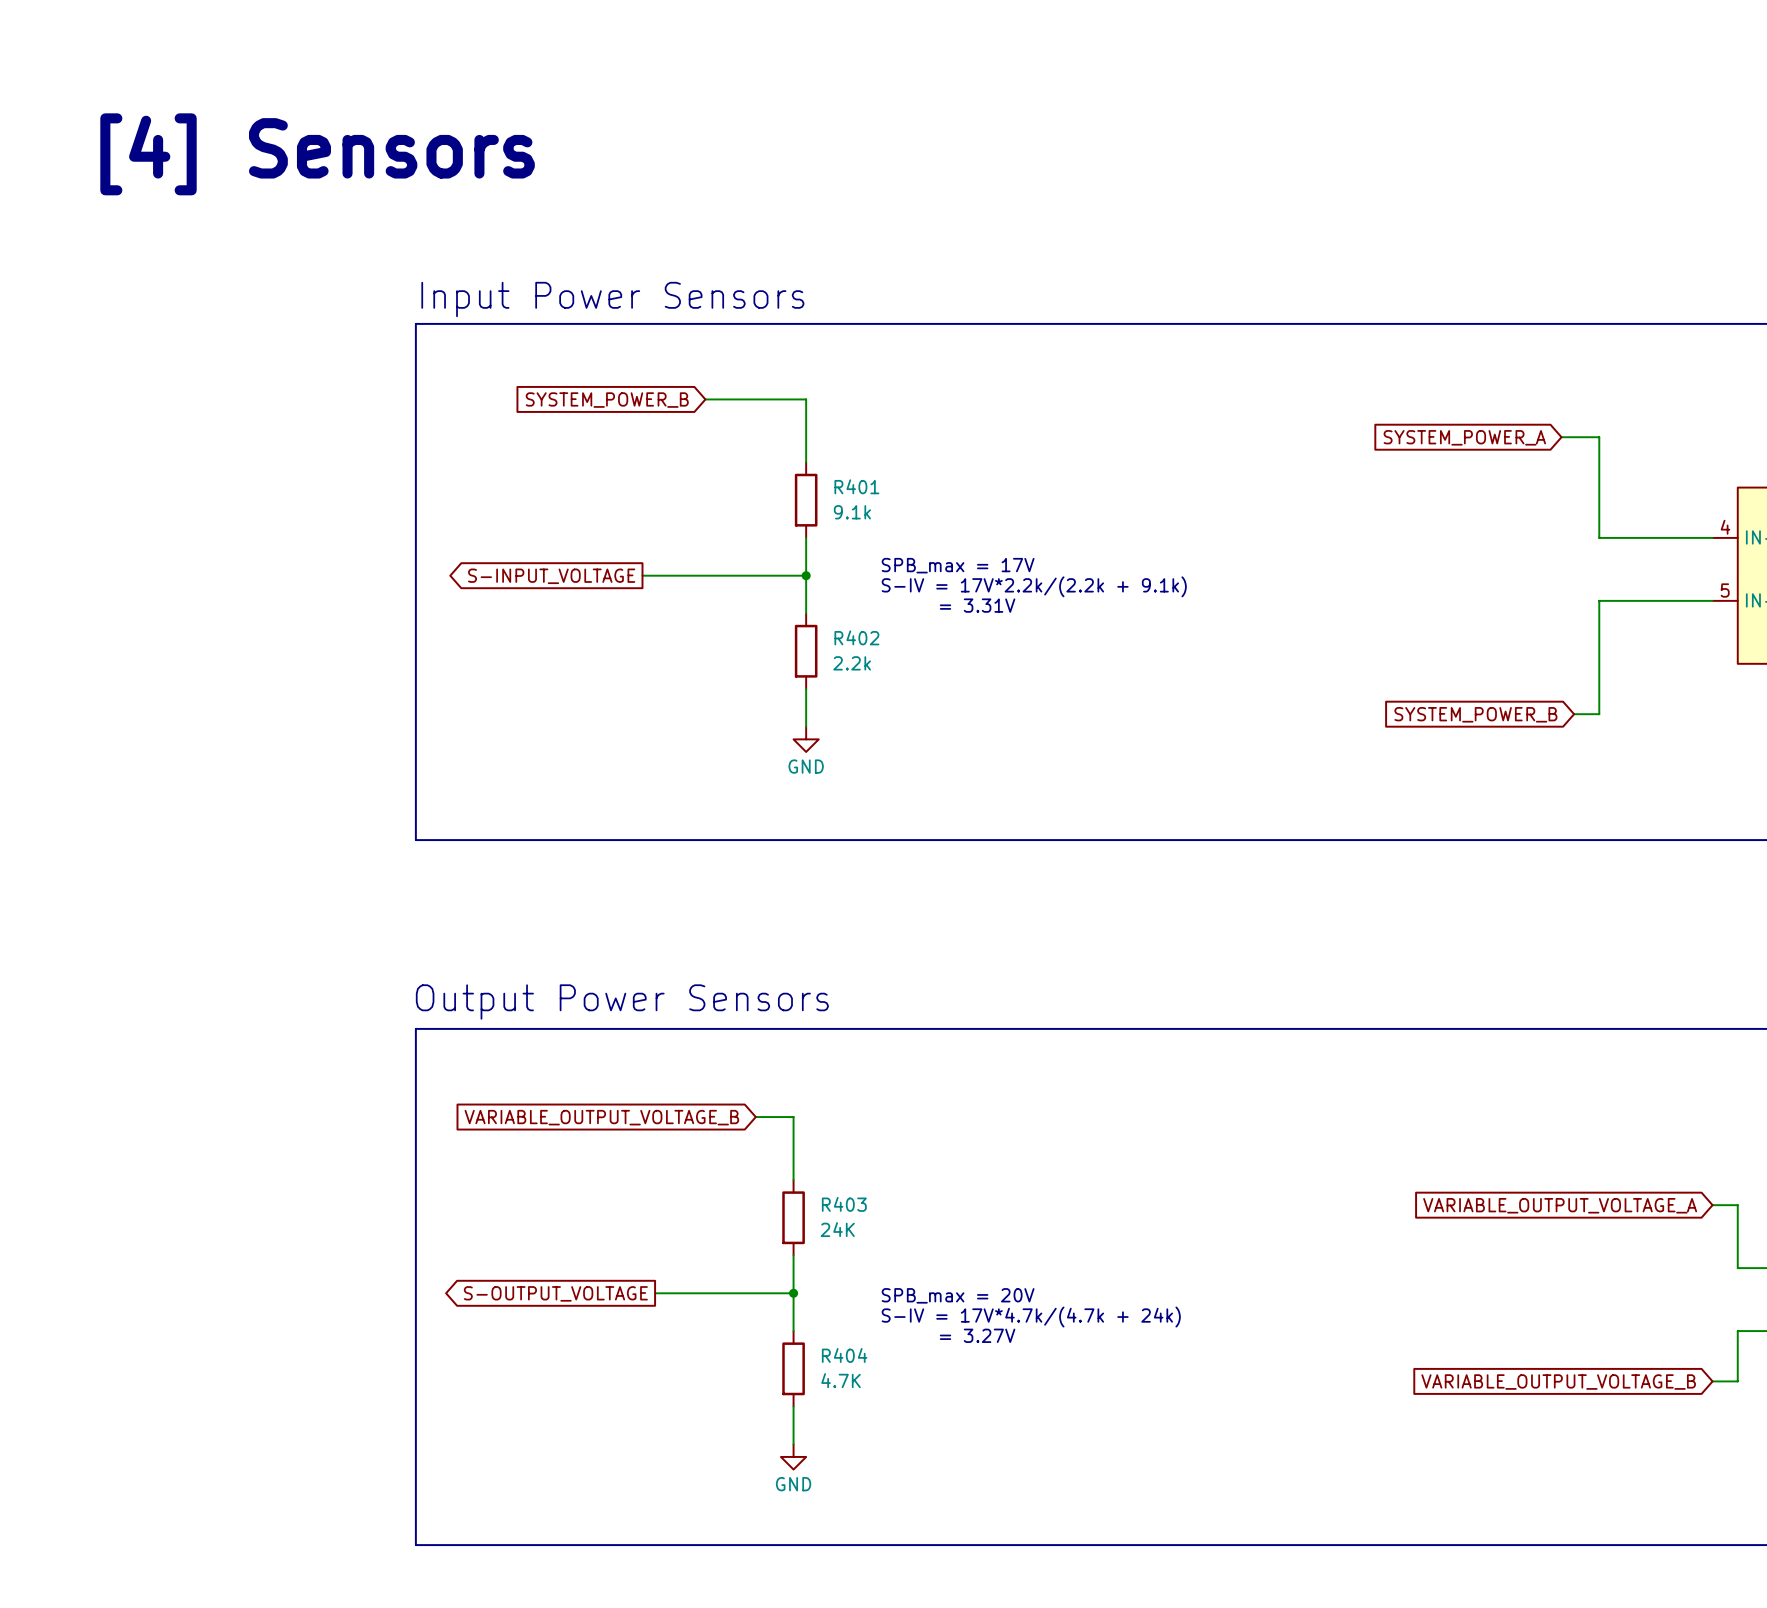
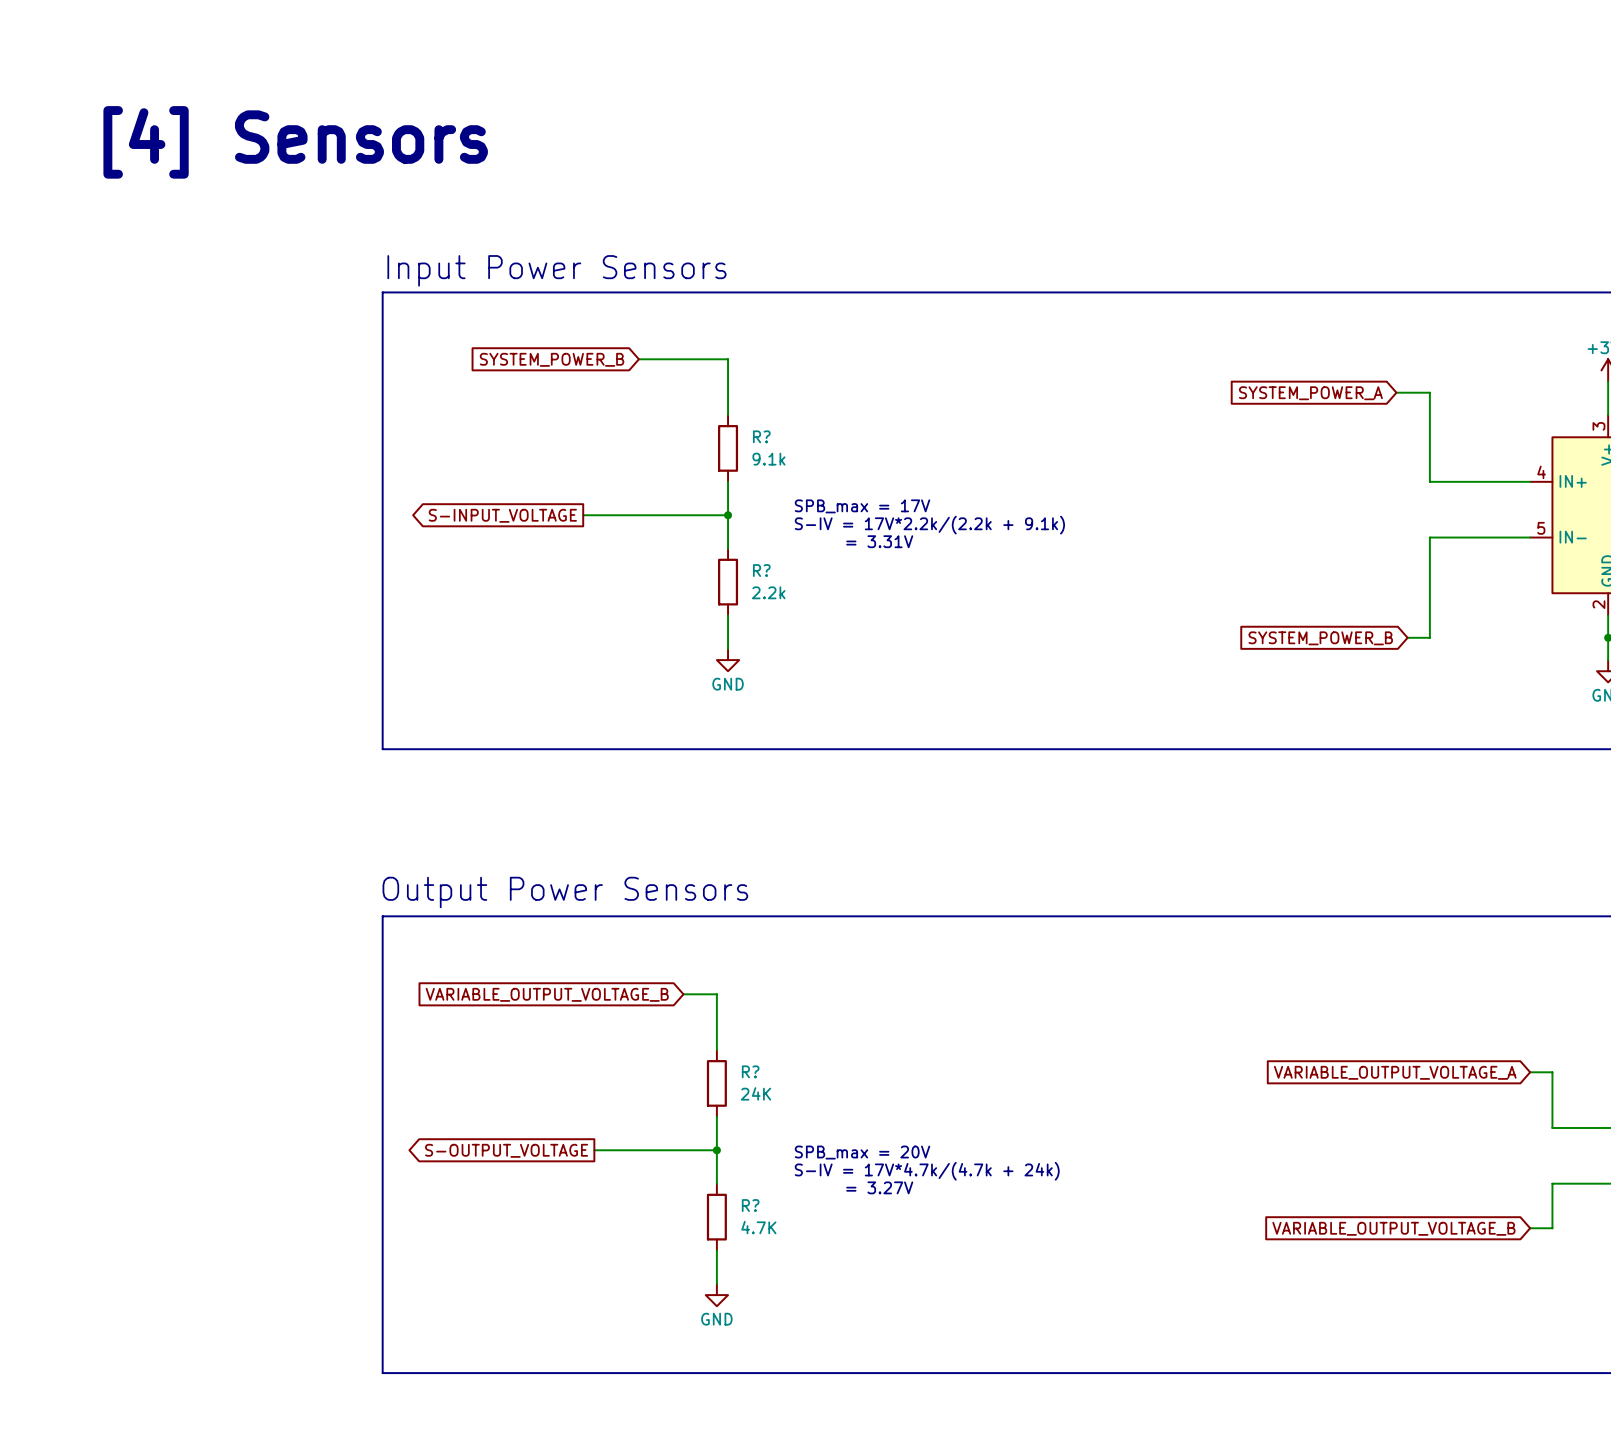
R401 name: R401 (856, 486) -> R? (761, 436)
R402 name: R402 (856, 637) -> R? (761, 570)
R403 name: R403 (844, 1204) -> R? (750, 1071)
R404 name: R404 (844, 1355) -> R? (750, 1205)

